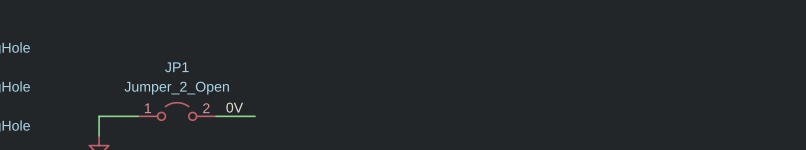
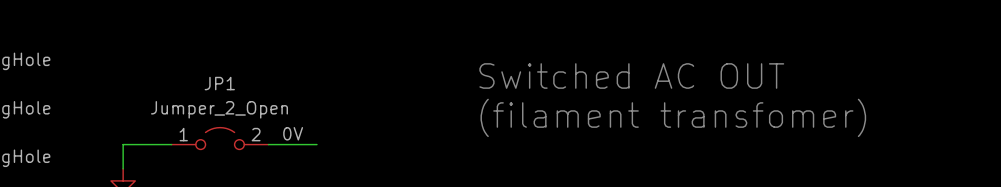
text: none -> Switched AC OUT (631, 75)
text: none -> (filament transfomer) (673, 117)

